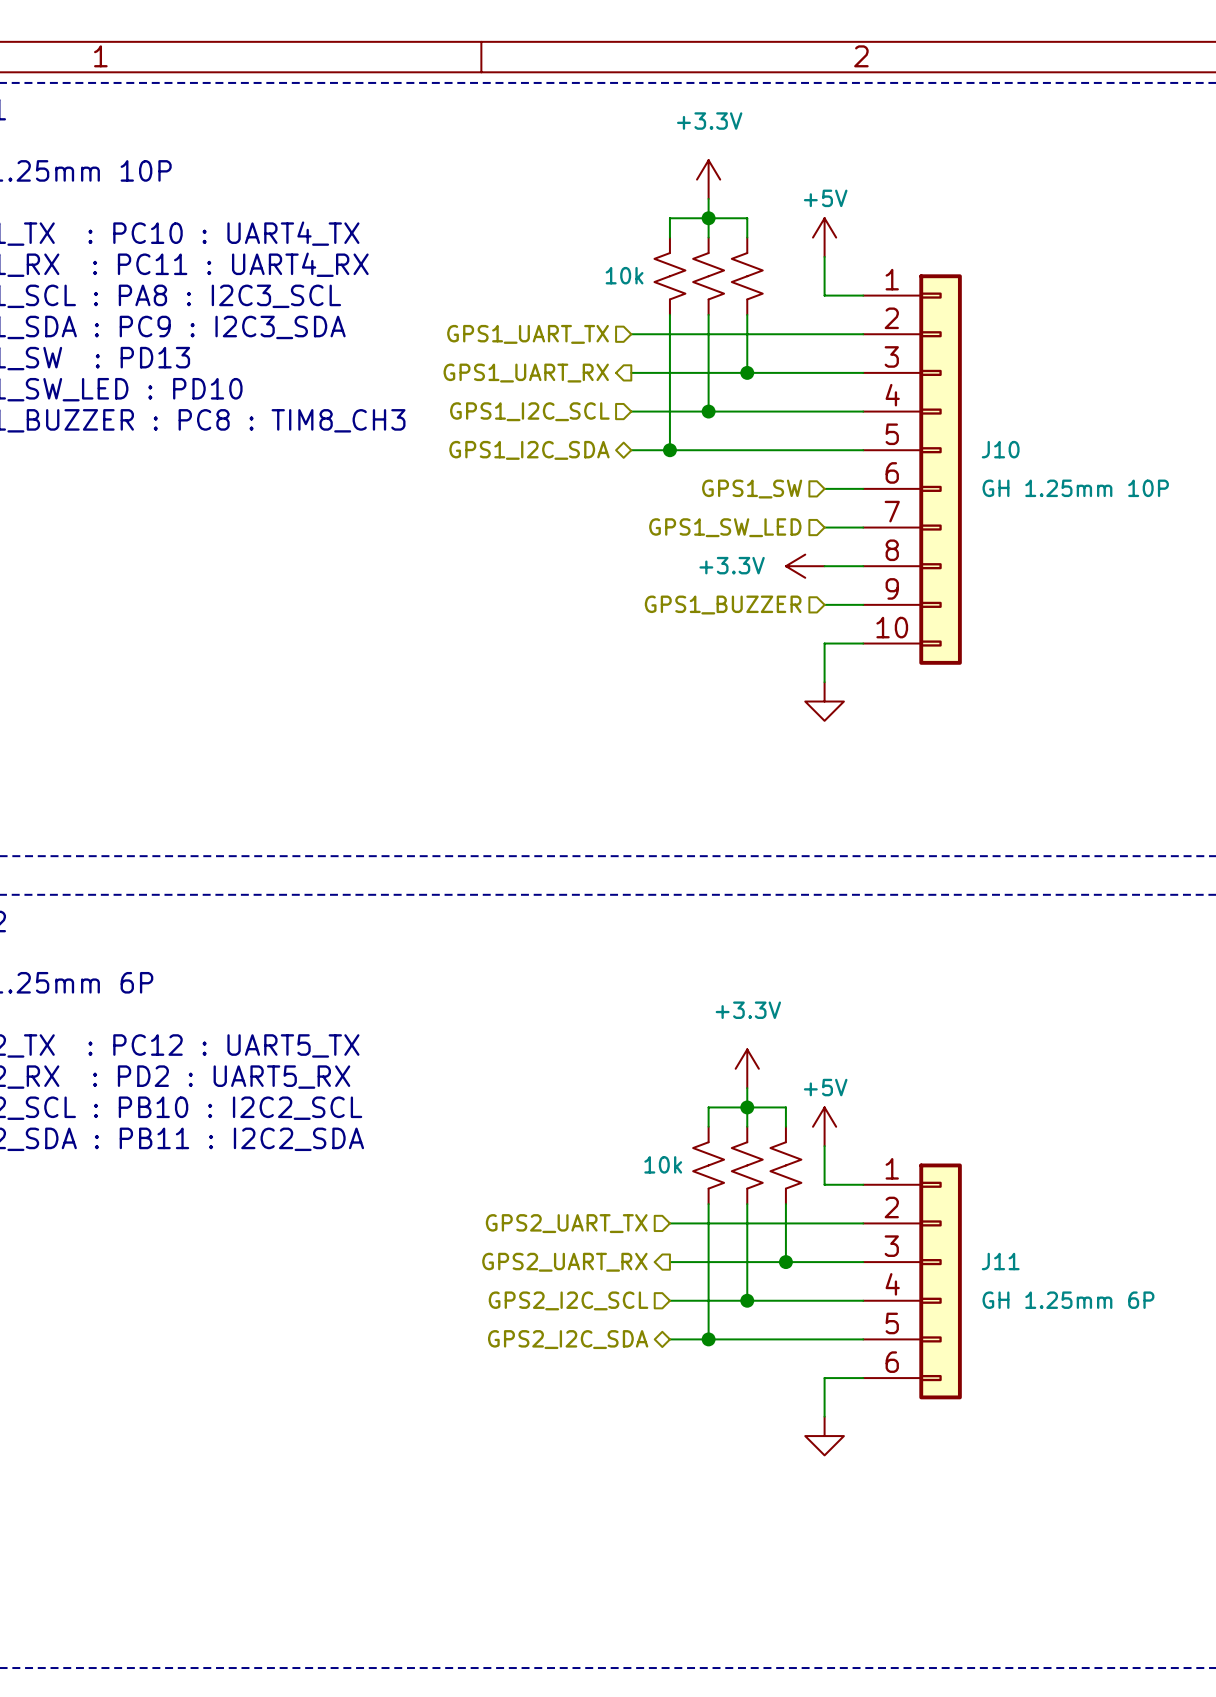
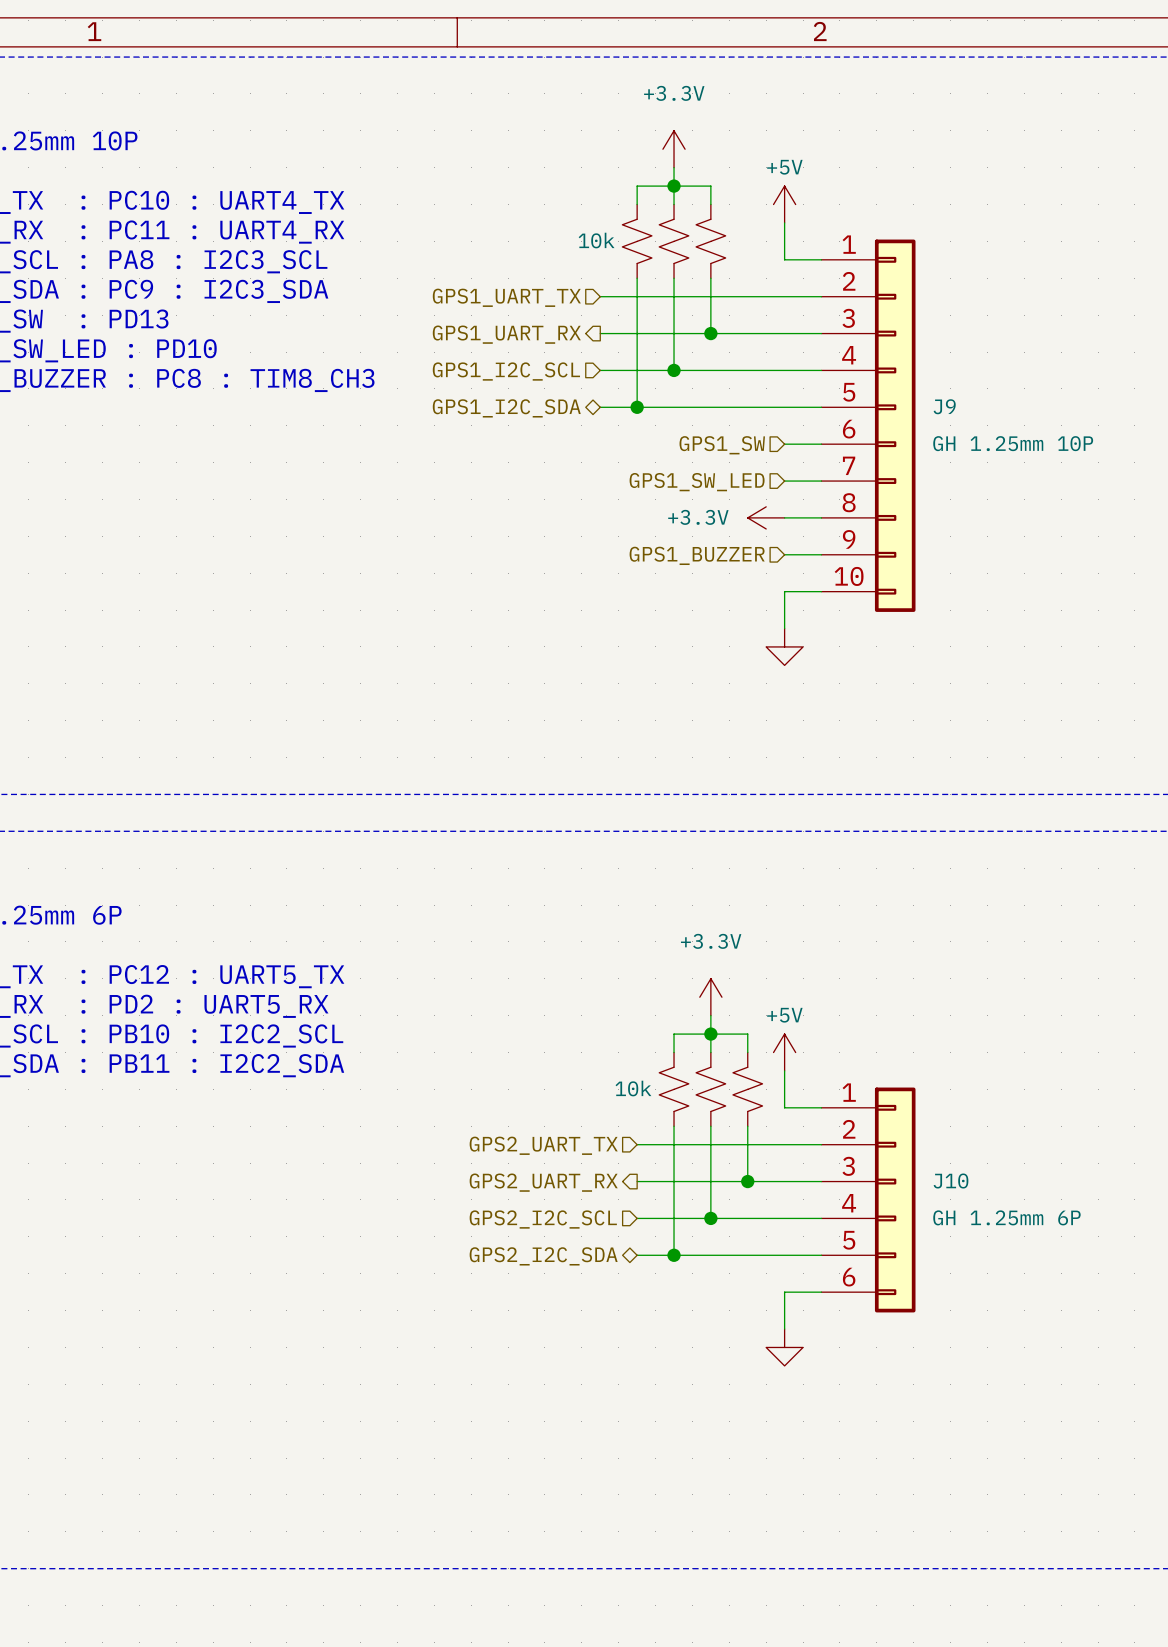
J10 name: J10 (1000, 449) -> J9 (944, 406)
J11 name: J11 (1000, 1261) -> J10 (950, 1181)

